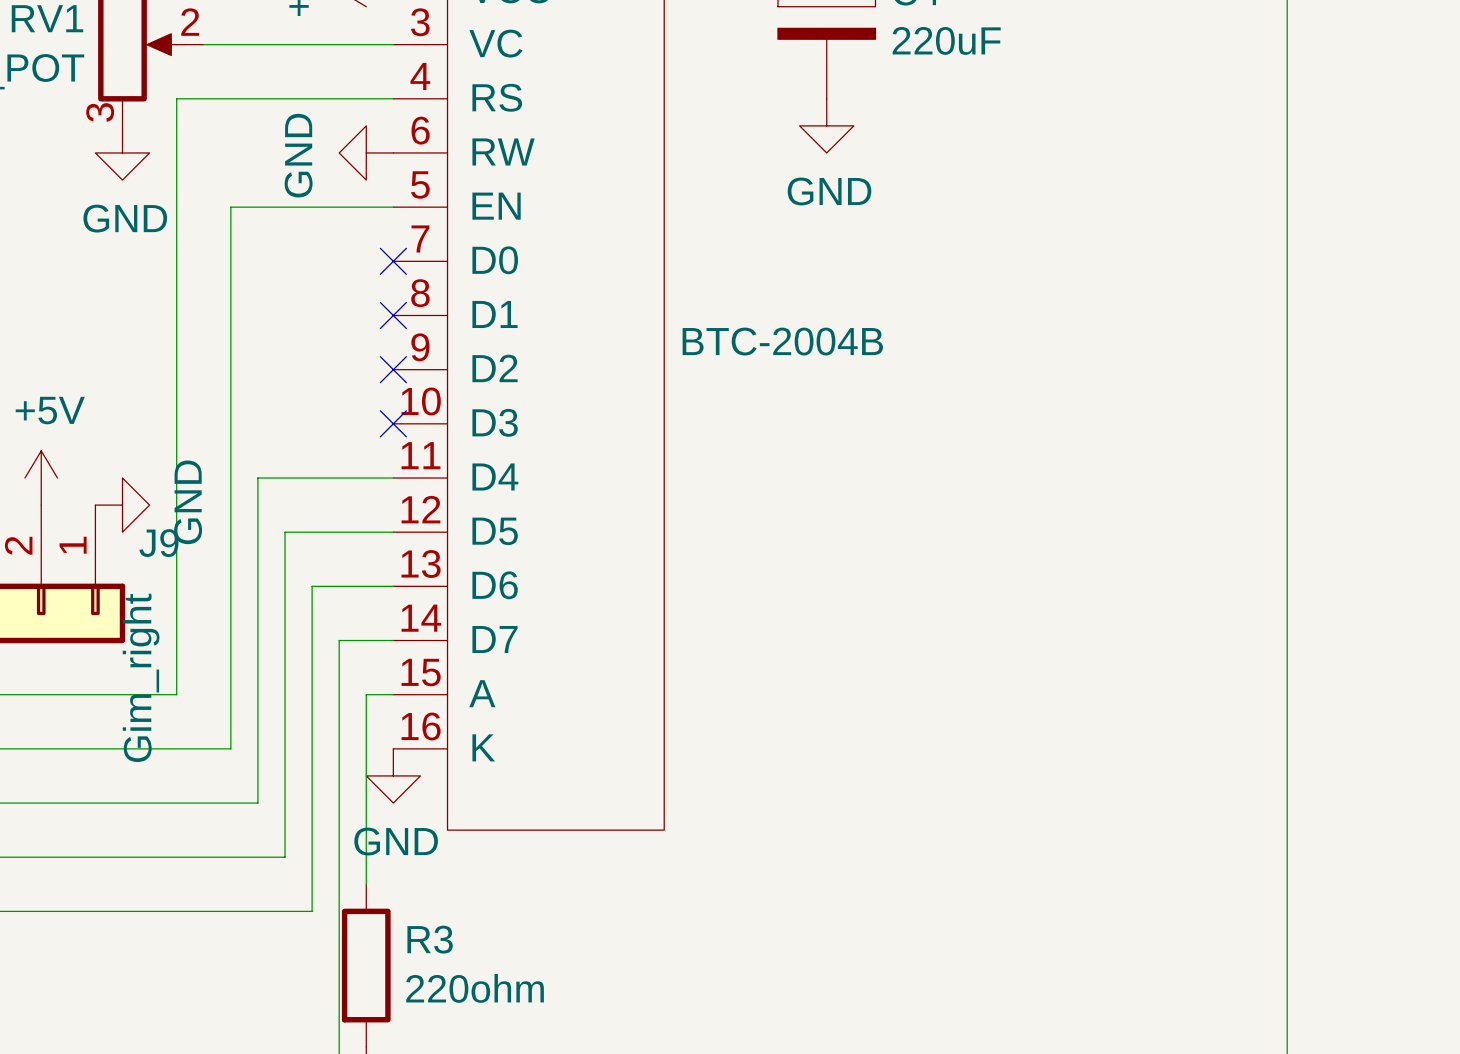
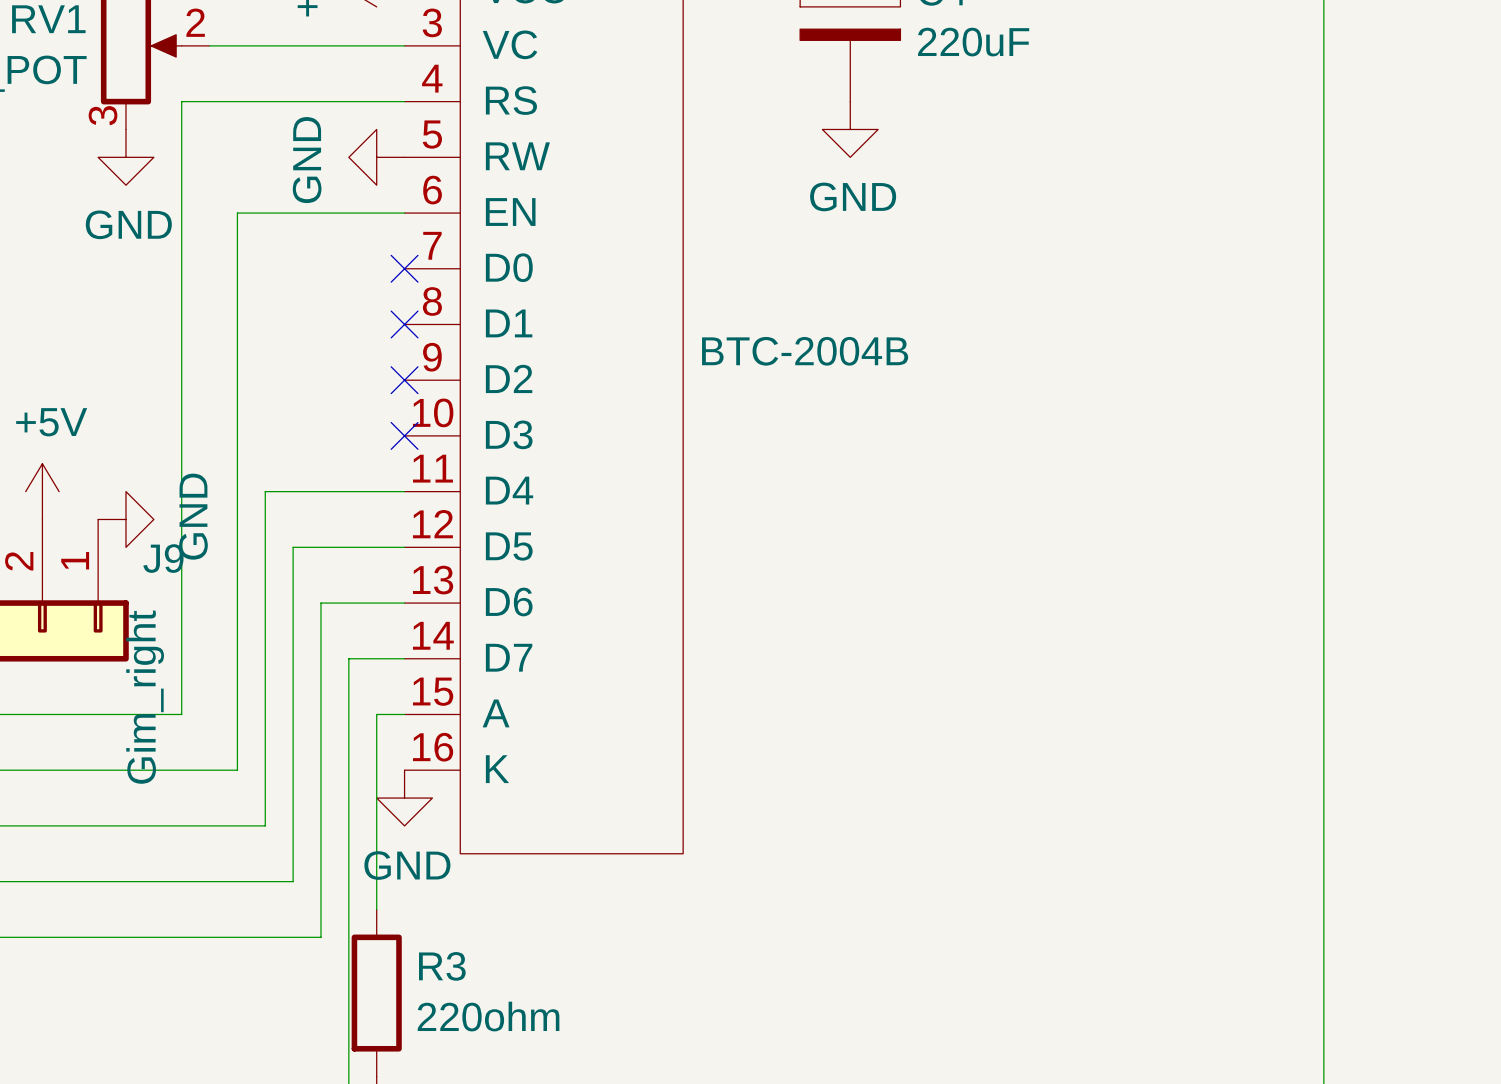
part pin number: 6 (420, 130) -> 5 (432, 134)
part pin number: 5 (420, 185) -> 6 (432, 190)

